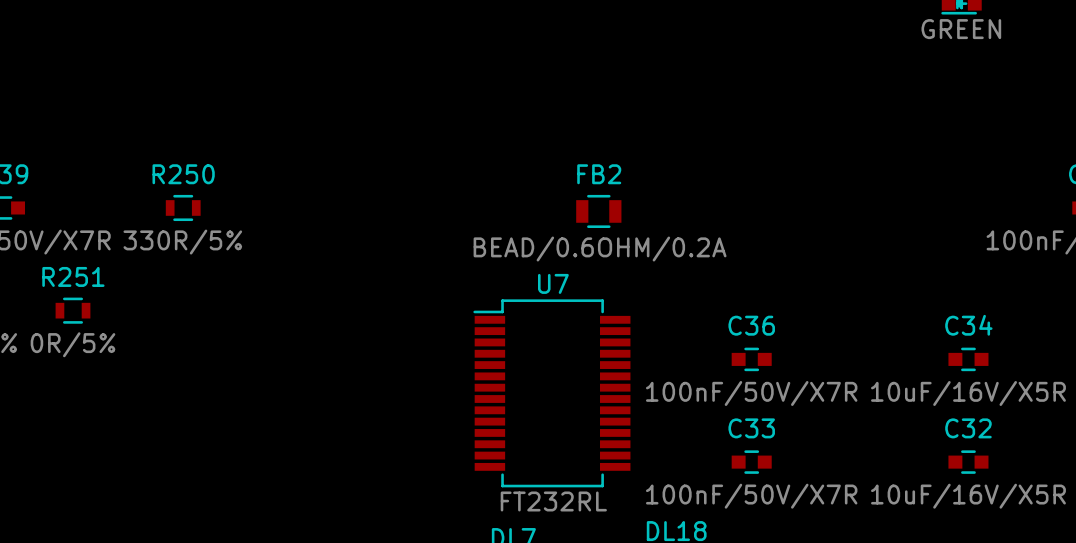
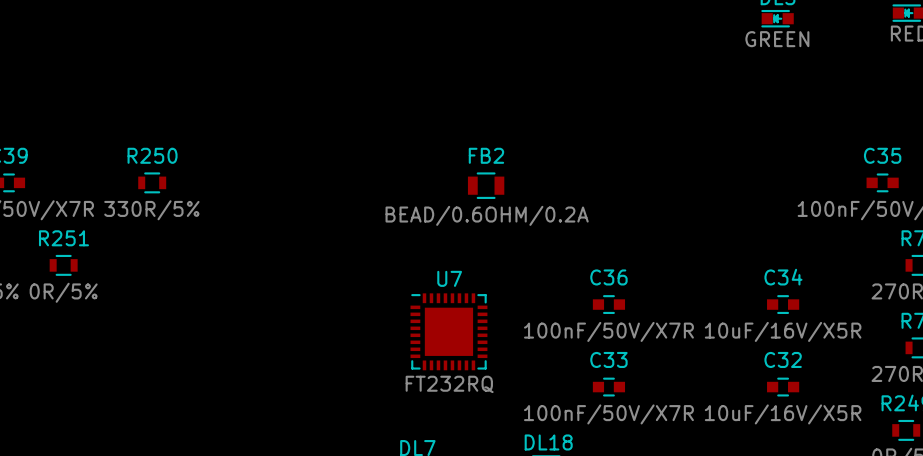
U7 name position: U7 (553, 283) -> U7 (449, 278)
U7 footprint: [473, 299, 631, 488] -> [410, 293, 488, 371]
U7 value: FT232RL (553, 501) -> FT232RQ (449, 384)

